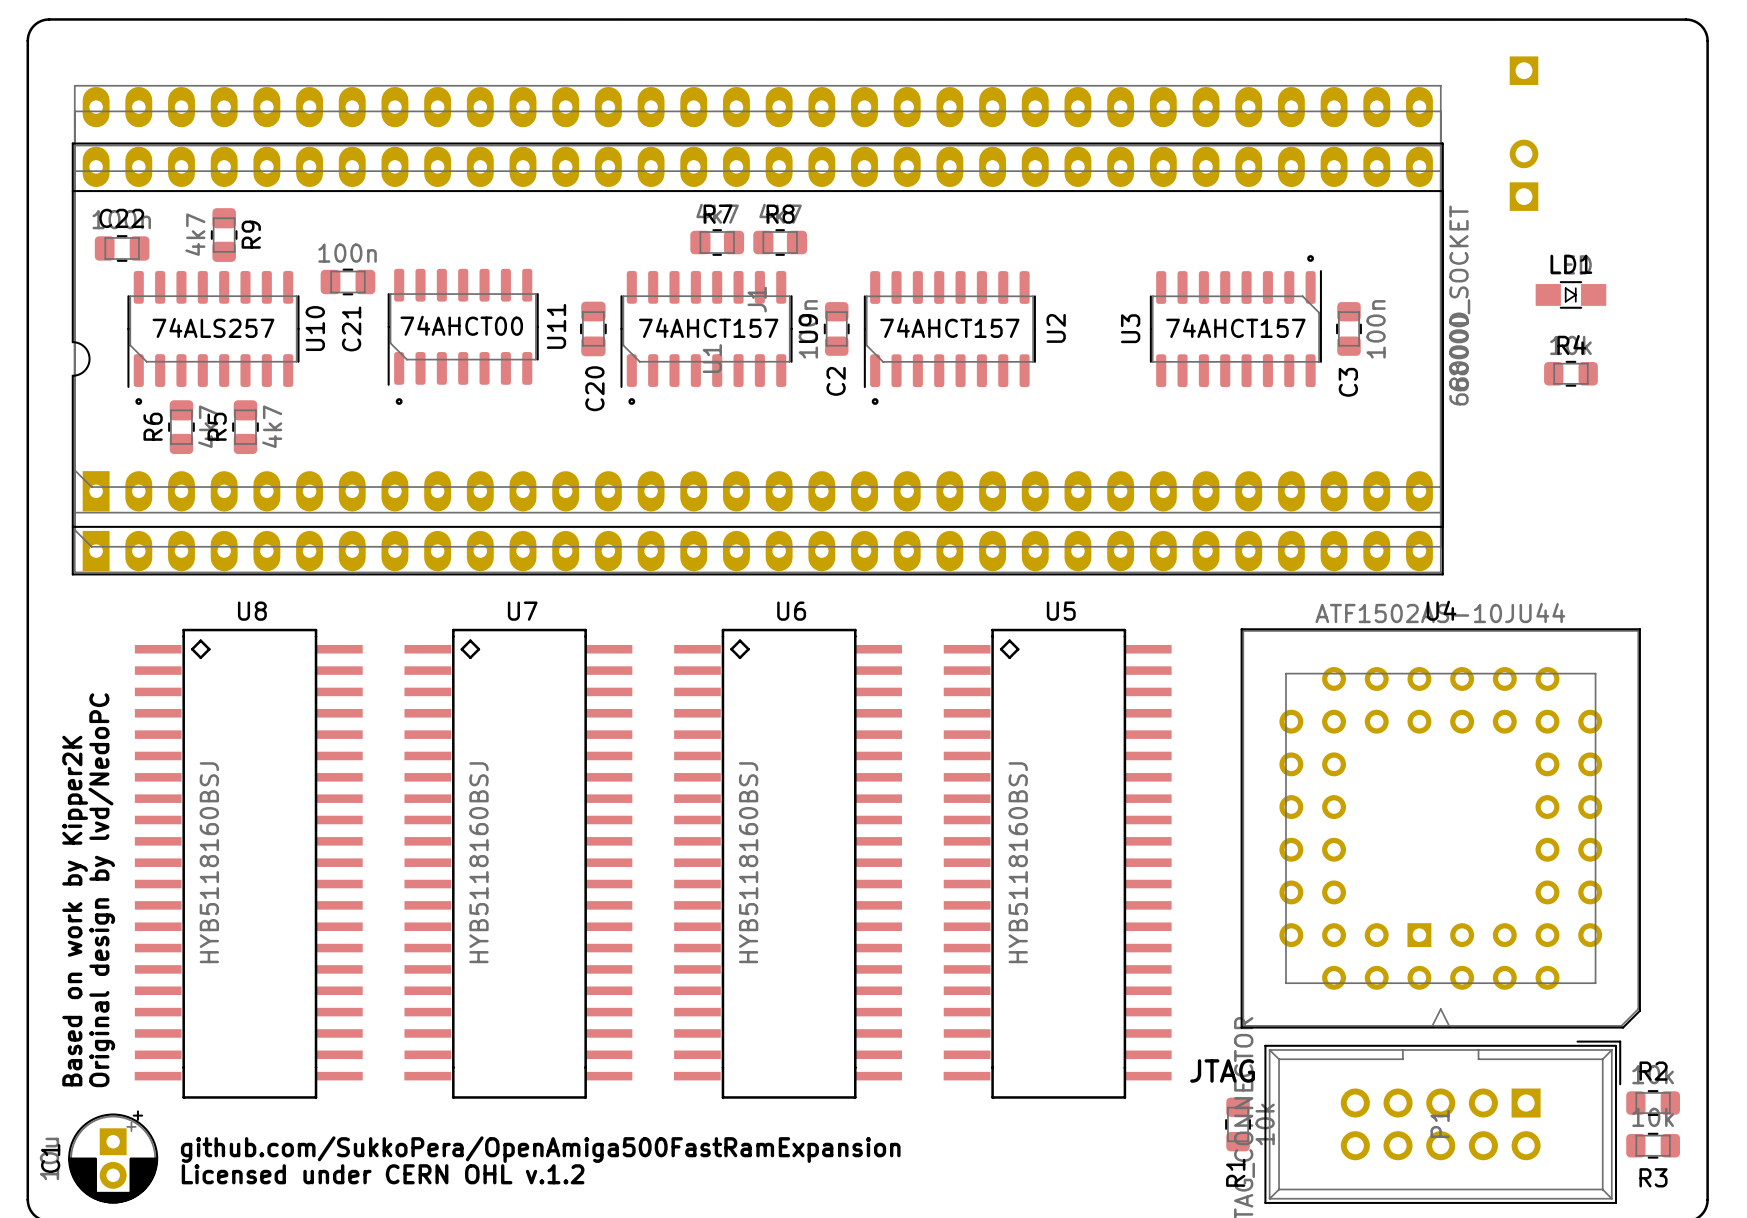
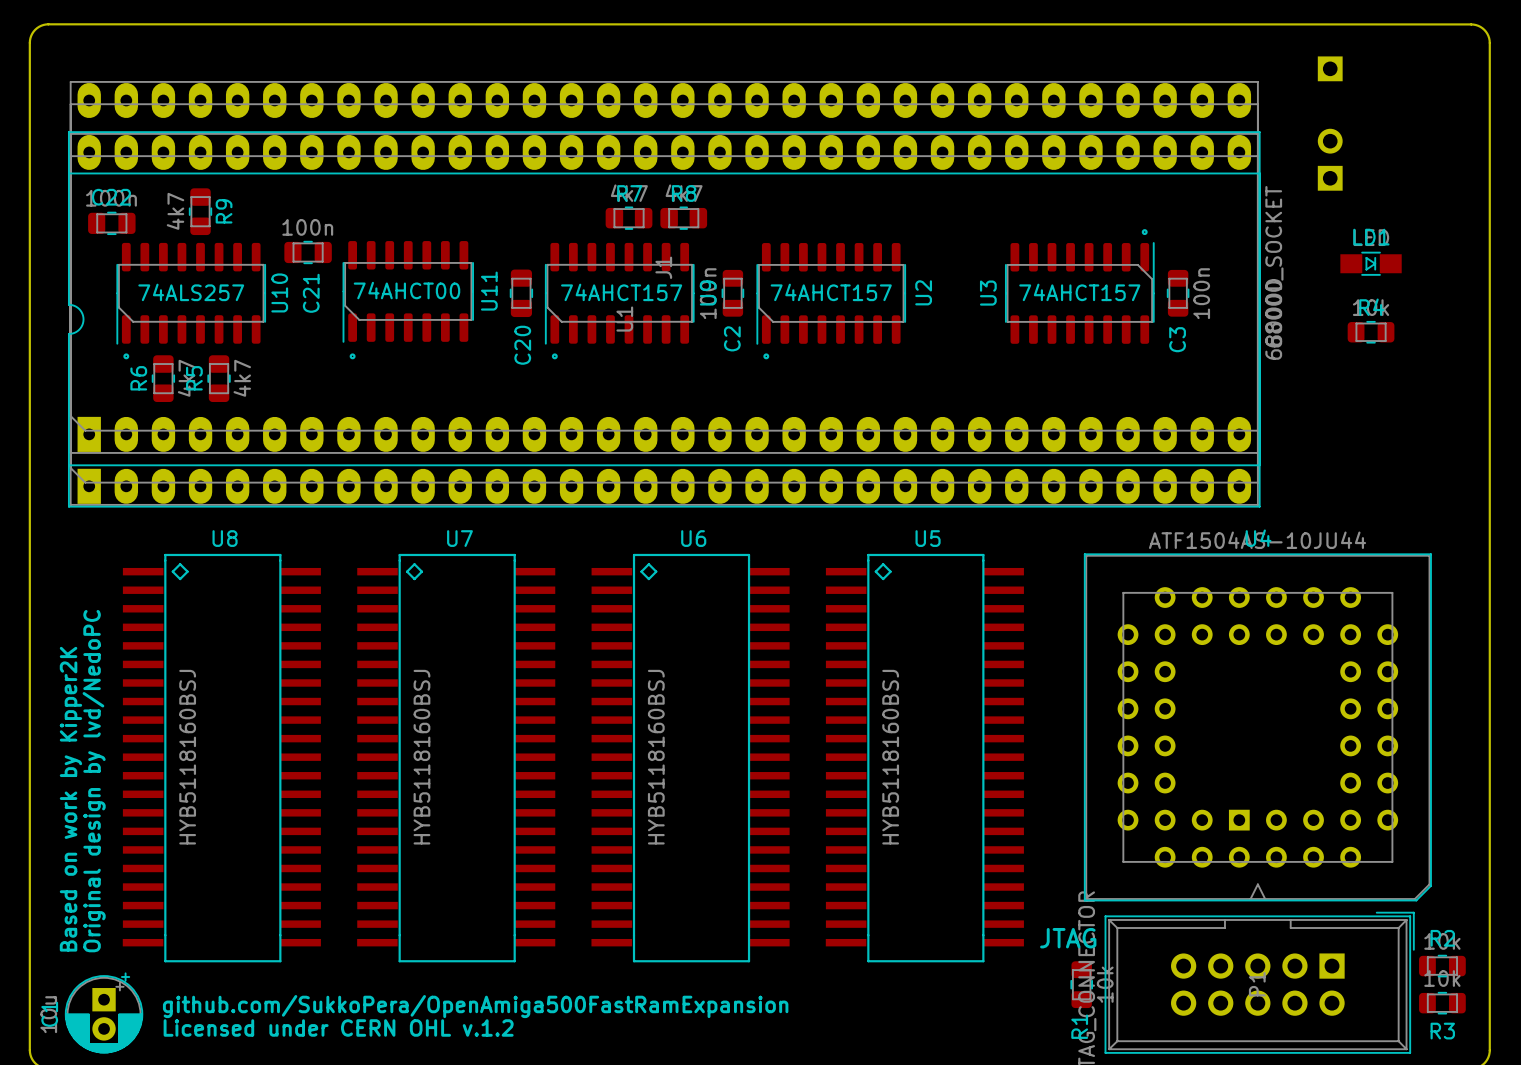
U4 value: ATF1502AS-10JU44 (1440, 613) -> ATF1504AS-10JU44 (1257, 540)

